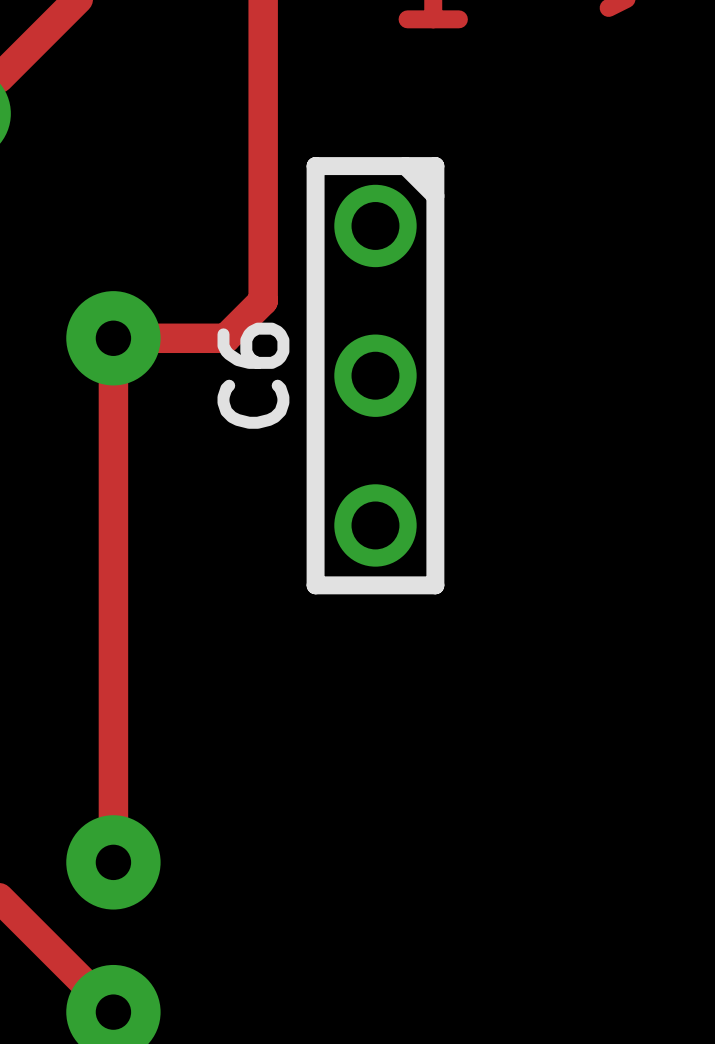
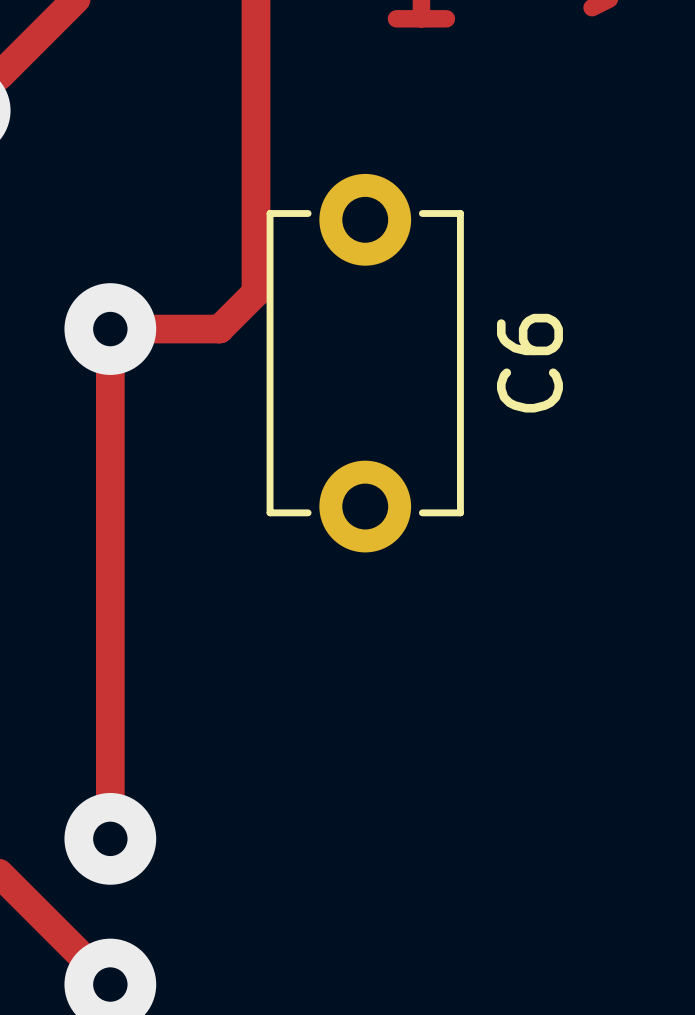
C6 footprint: [306, 157, 445, 595] -> [266, 173, 464, 553]
C6 name position: C6 (253, 375) -> C6 (529, 363)

